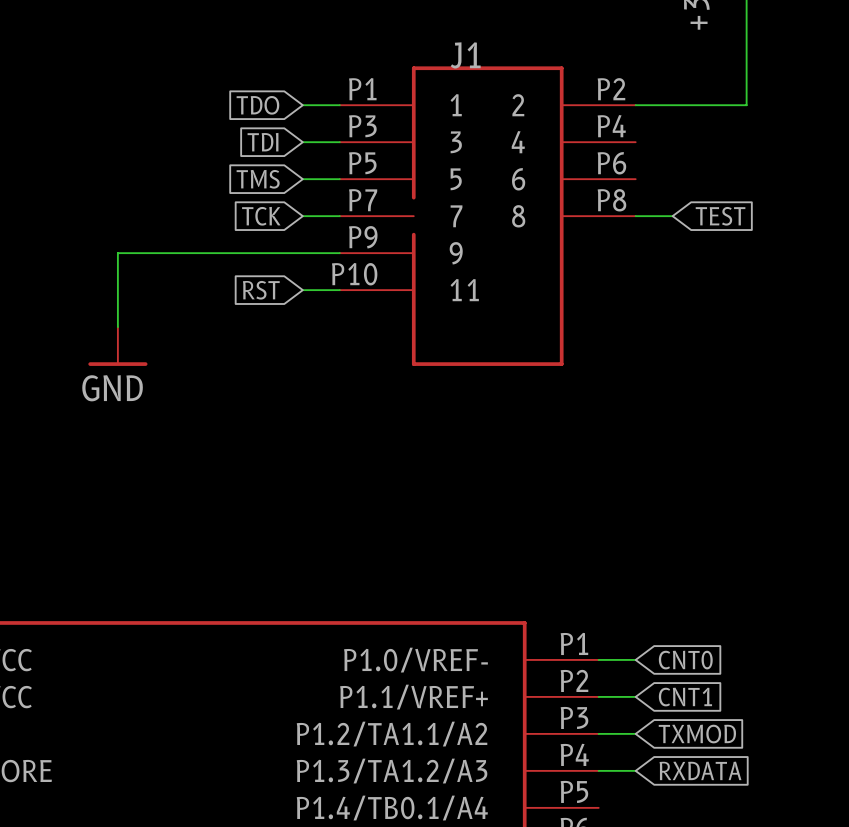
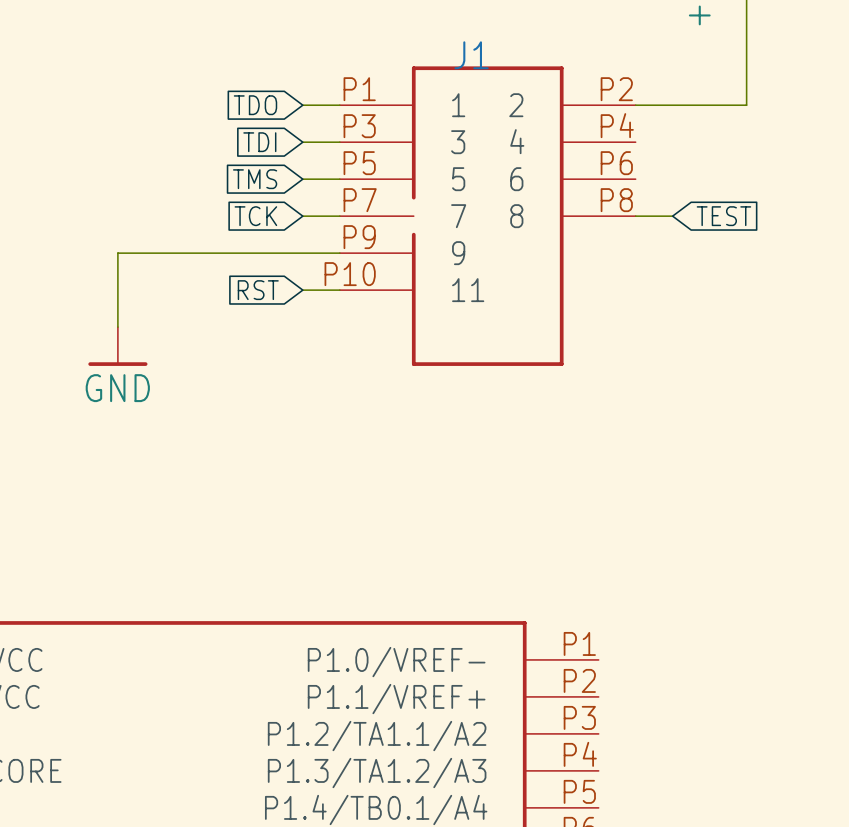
wire: (598, 659) (635, 659) -> none
global label: CNT0 (685, 660) -> none
wire: (598, 696) (635, 696) -> none
global label: CNT1 (685, 697) -> none
wire: (598, 733) (635, 733) -> none
global label: TXMOD (697, 734) -> none
wire: (598, 770) (635, 770) -> none
global label: RXDATA (700, 770) -> none

